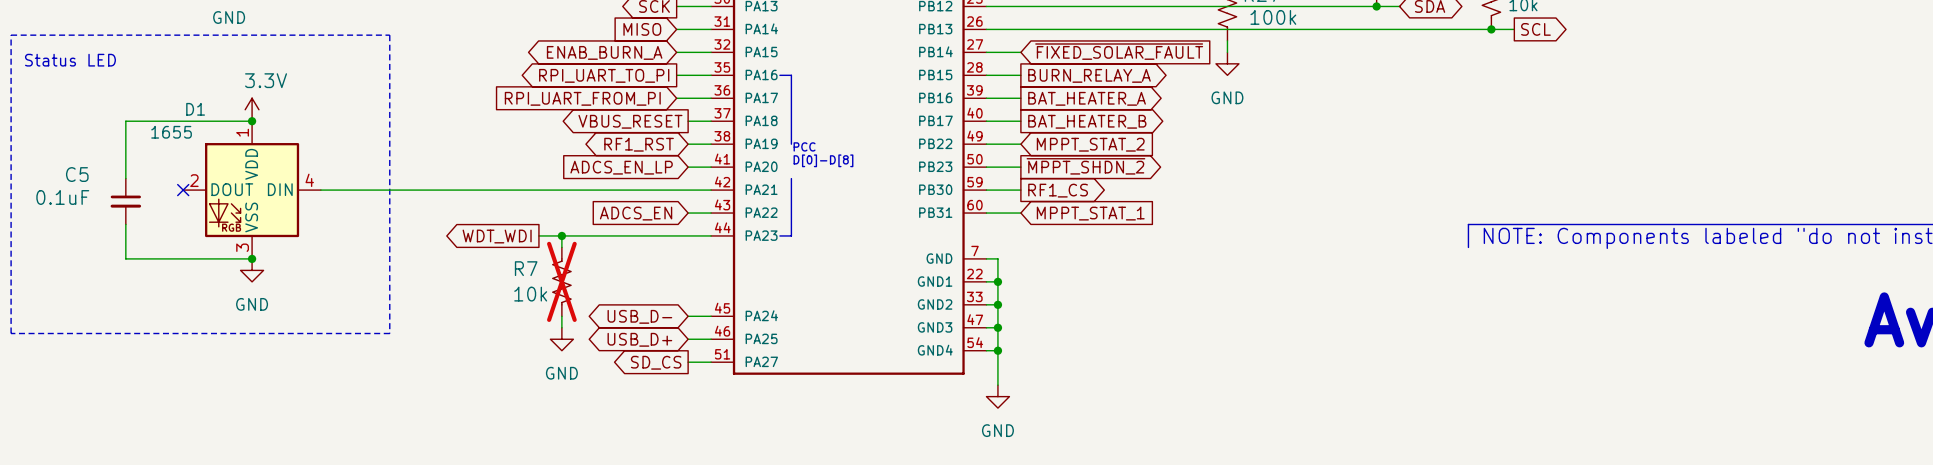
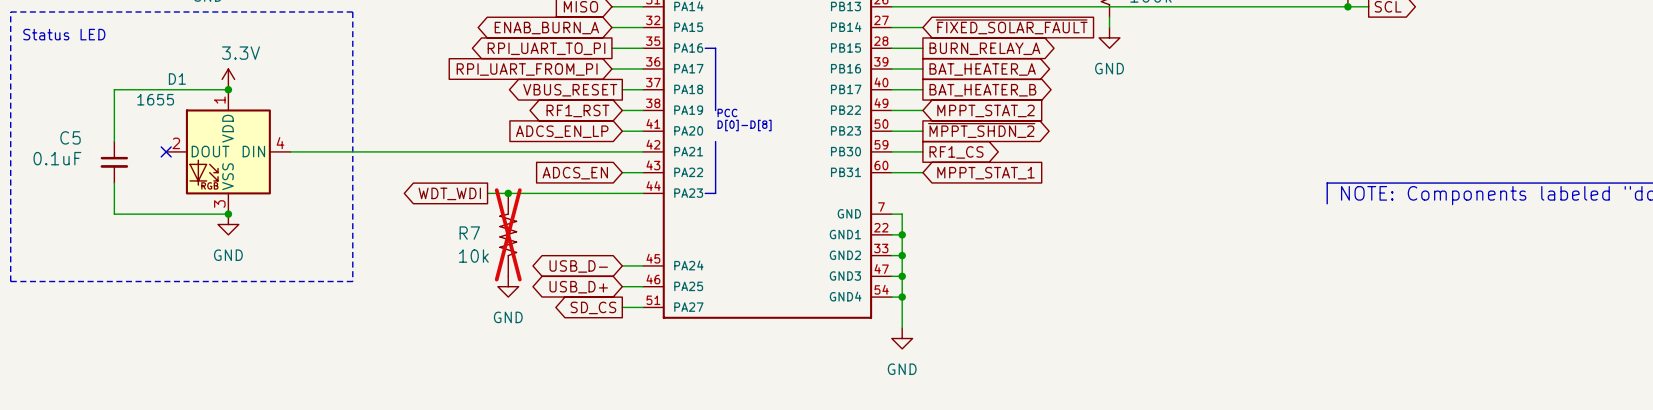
R7 symbol: [552, 247, 572, 317] -> [499, 193, 517, 277]

